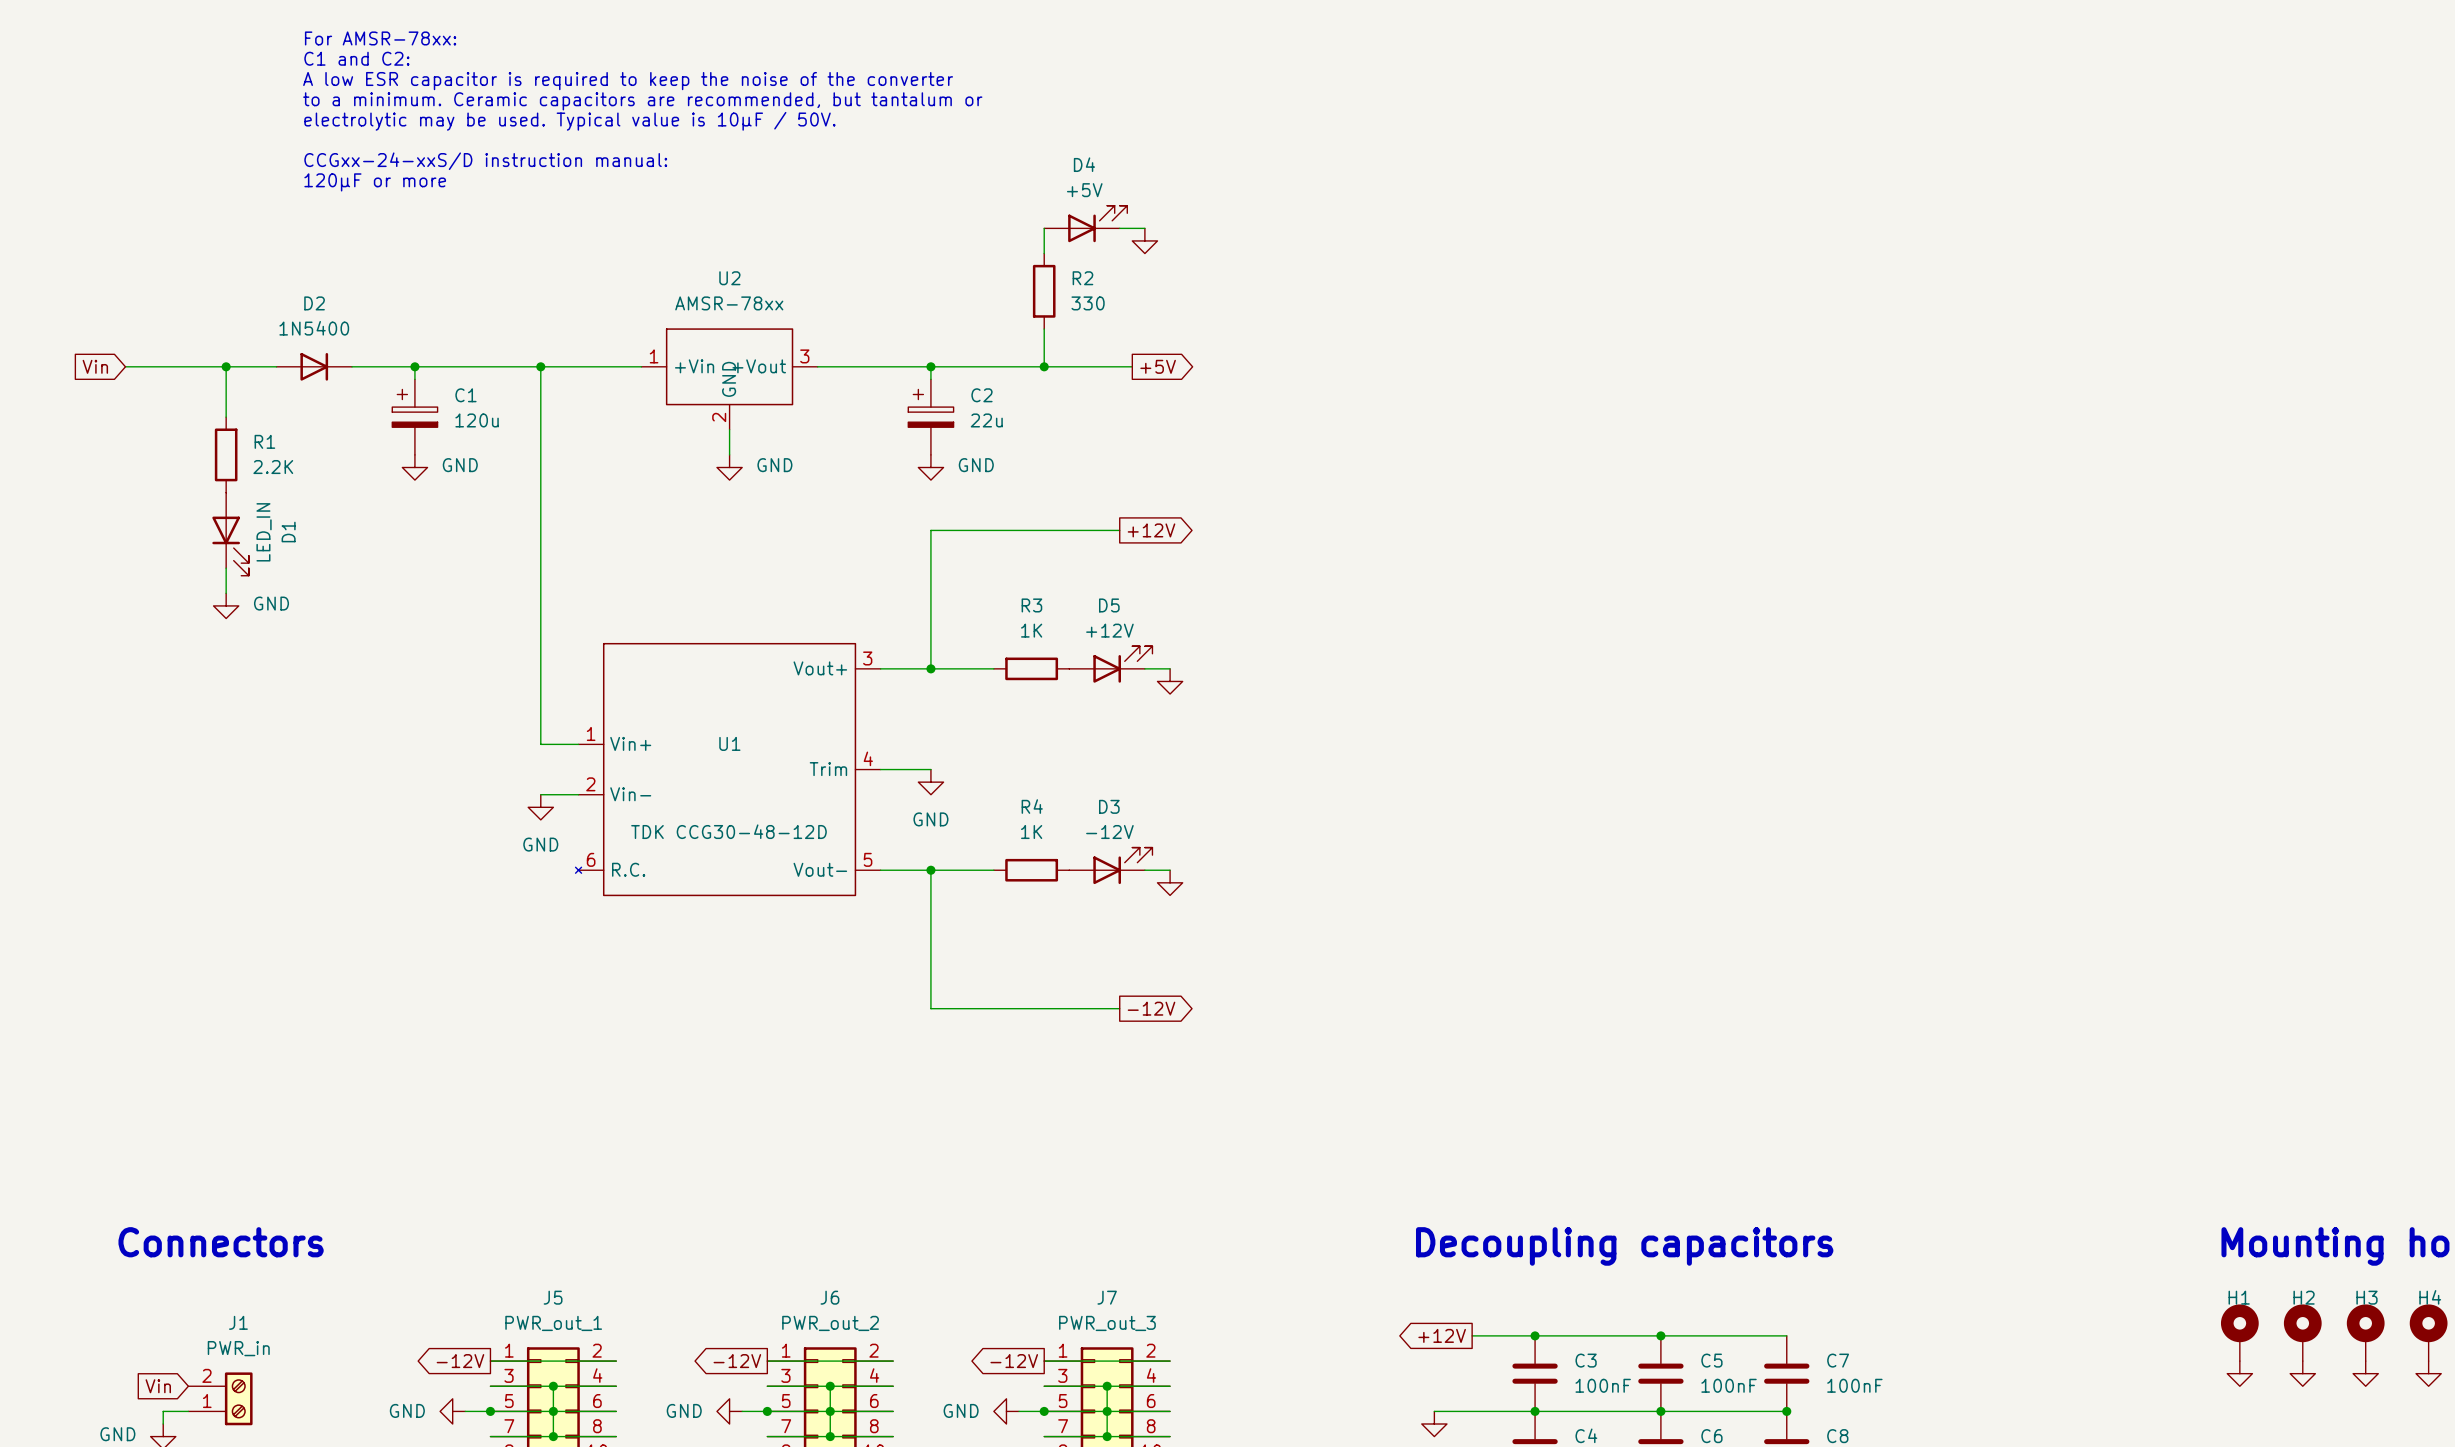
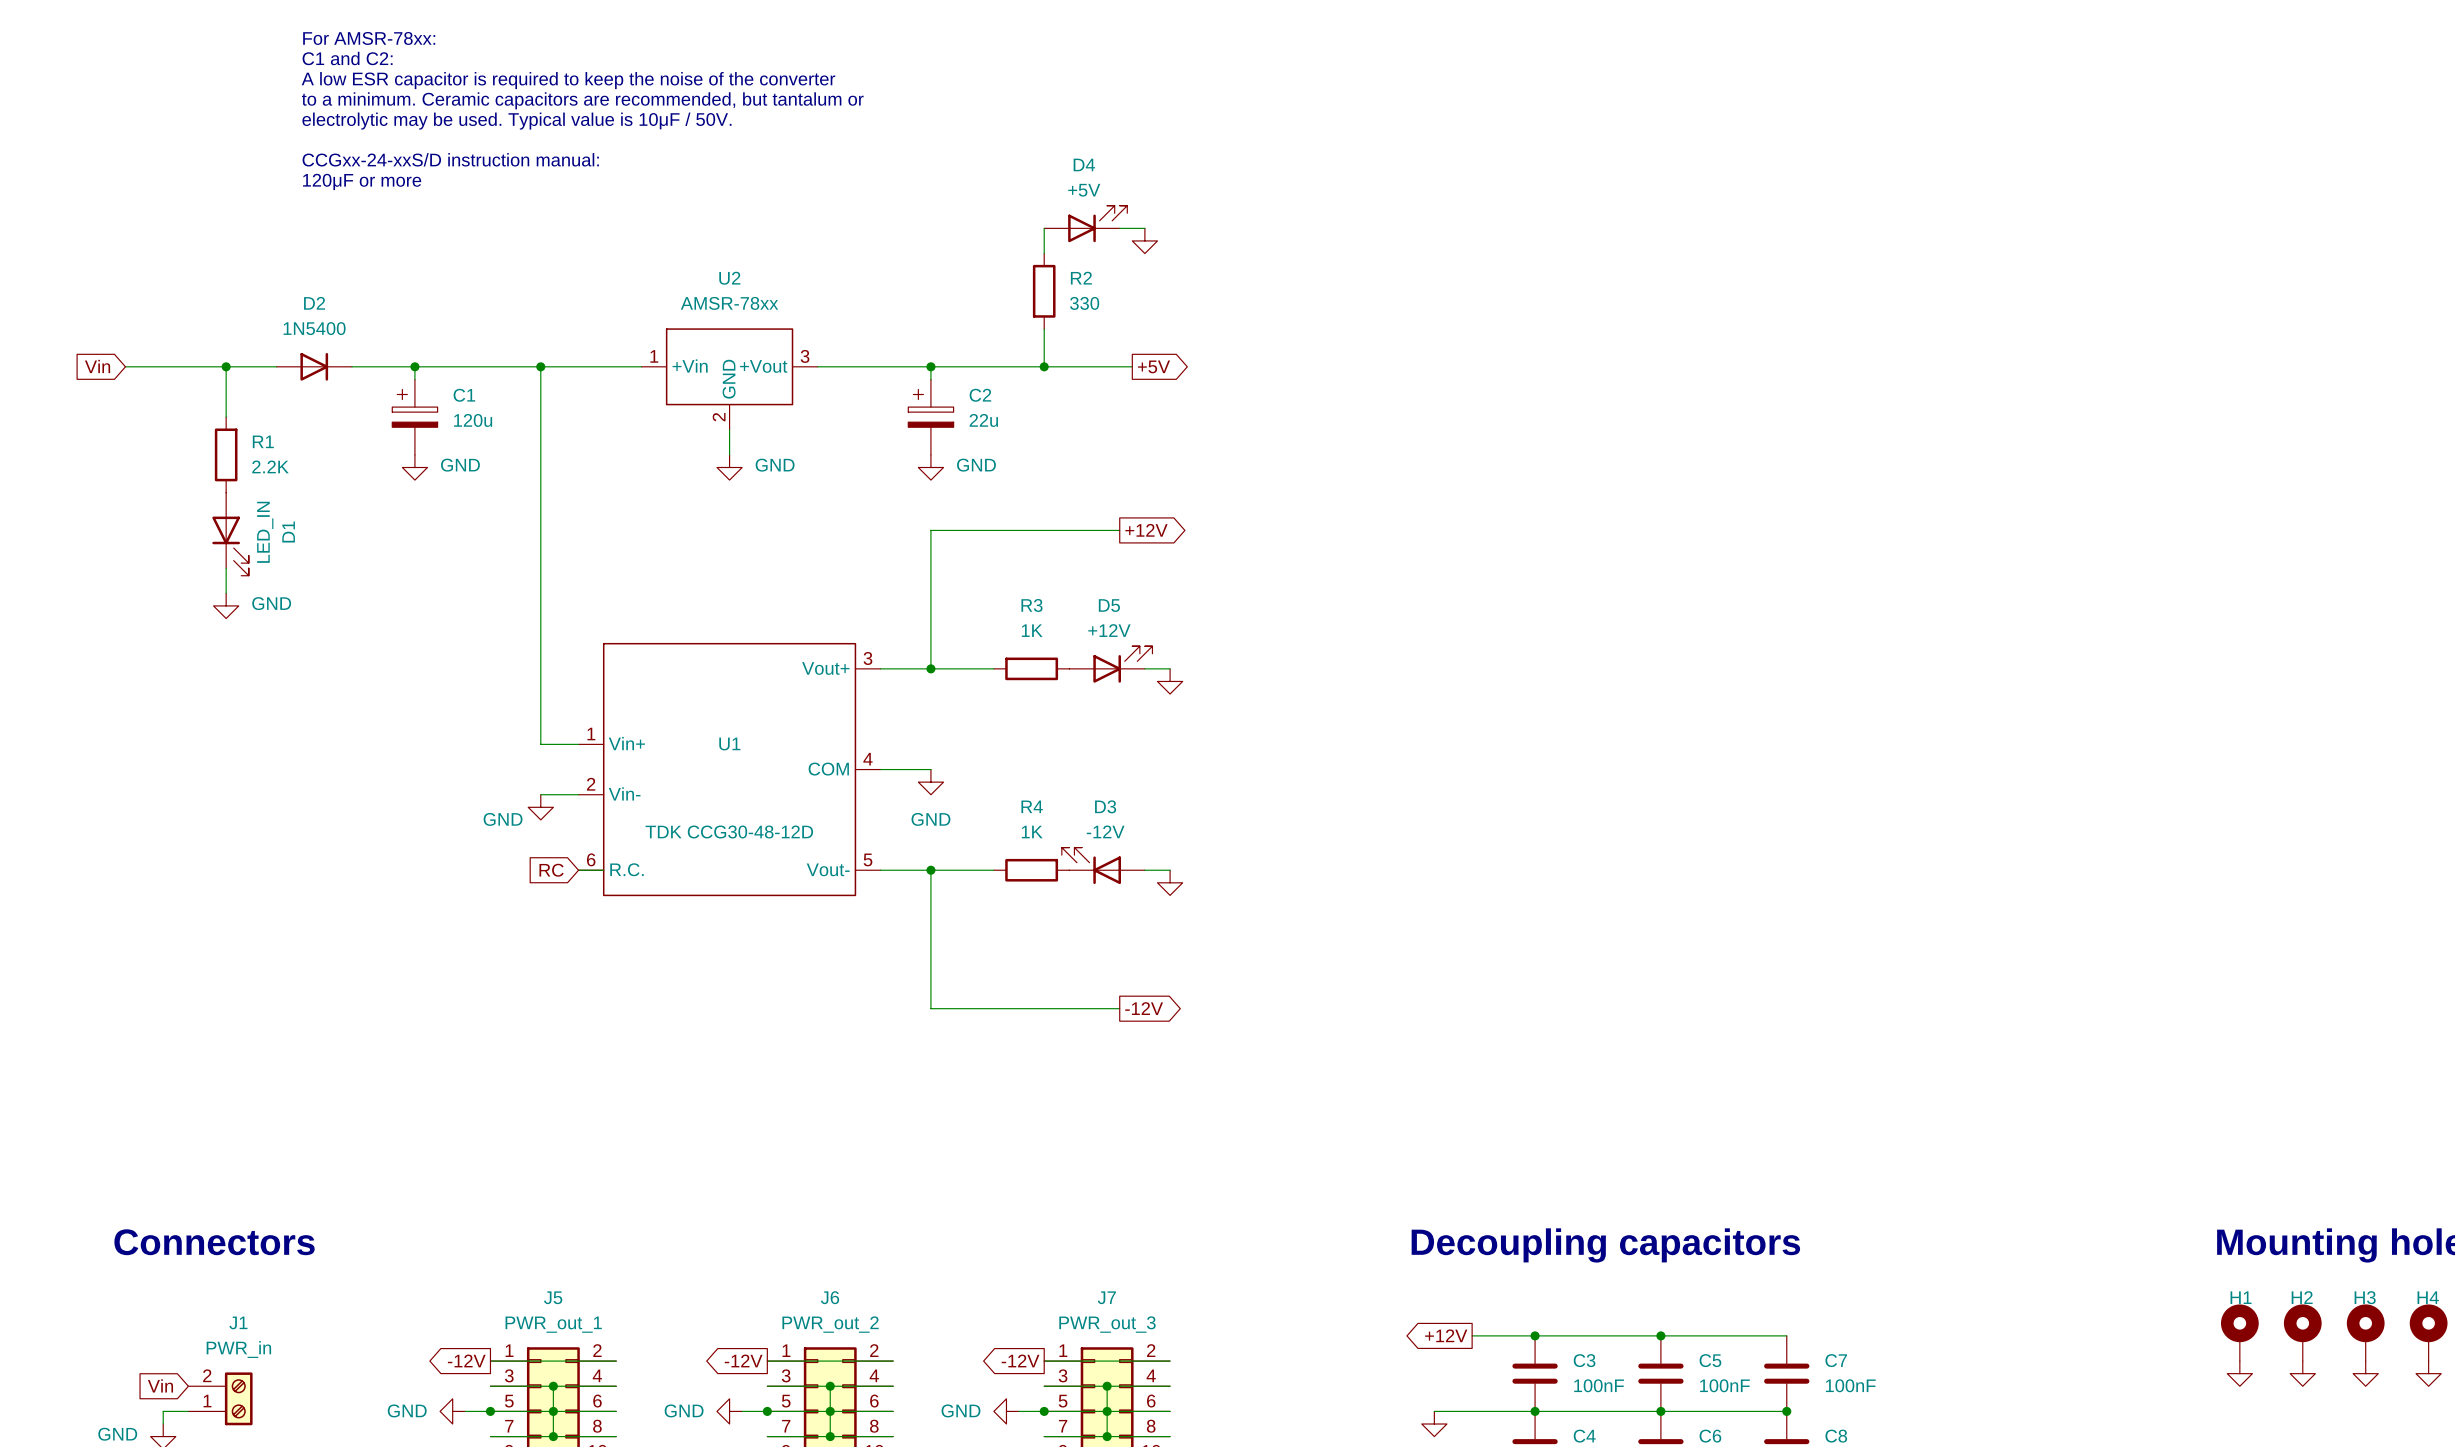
U1 symbol: [575, 642, 881, 897] -> [578, 642, 881, 897]
power symbol text position: GND (540, 844) -> GND (503, 819)
D3 flip: as is (1122, 865) -> left-right (1091, 865)
global label: none -> RC (551, 870)

